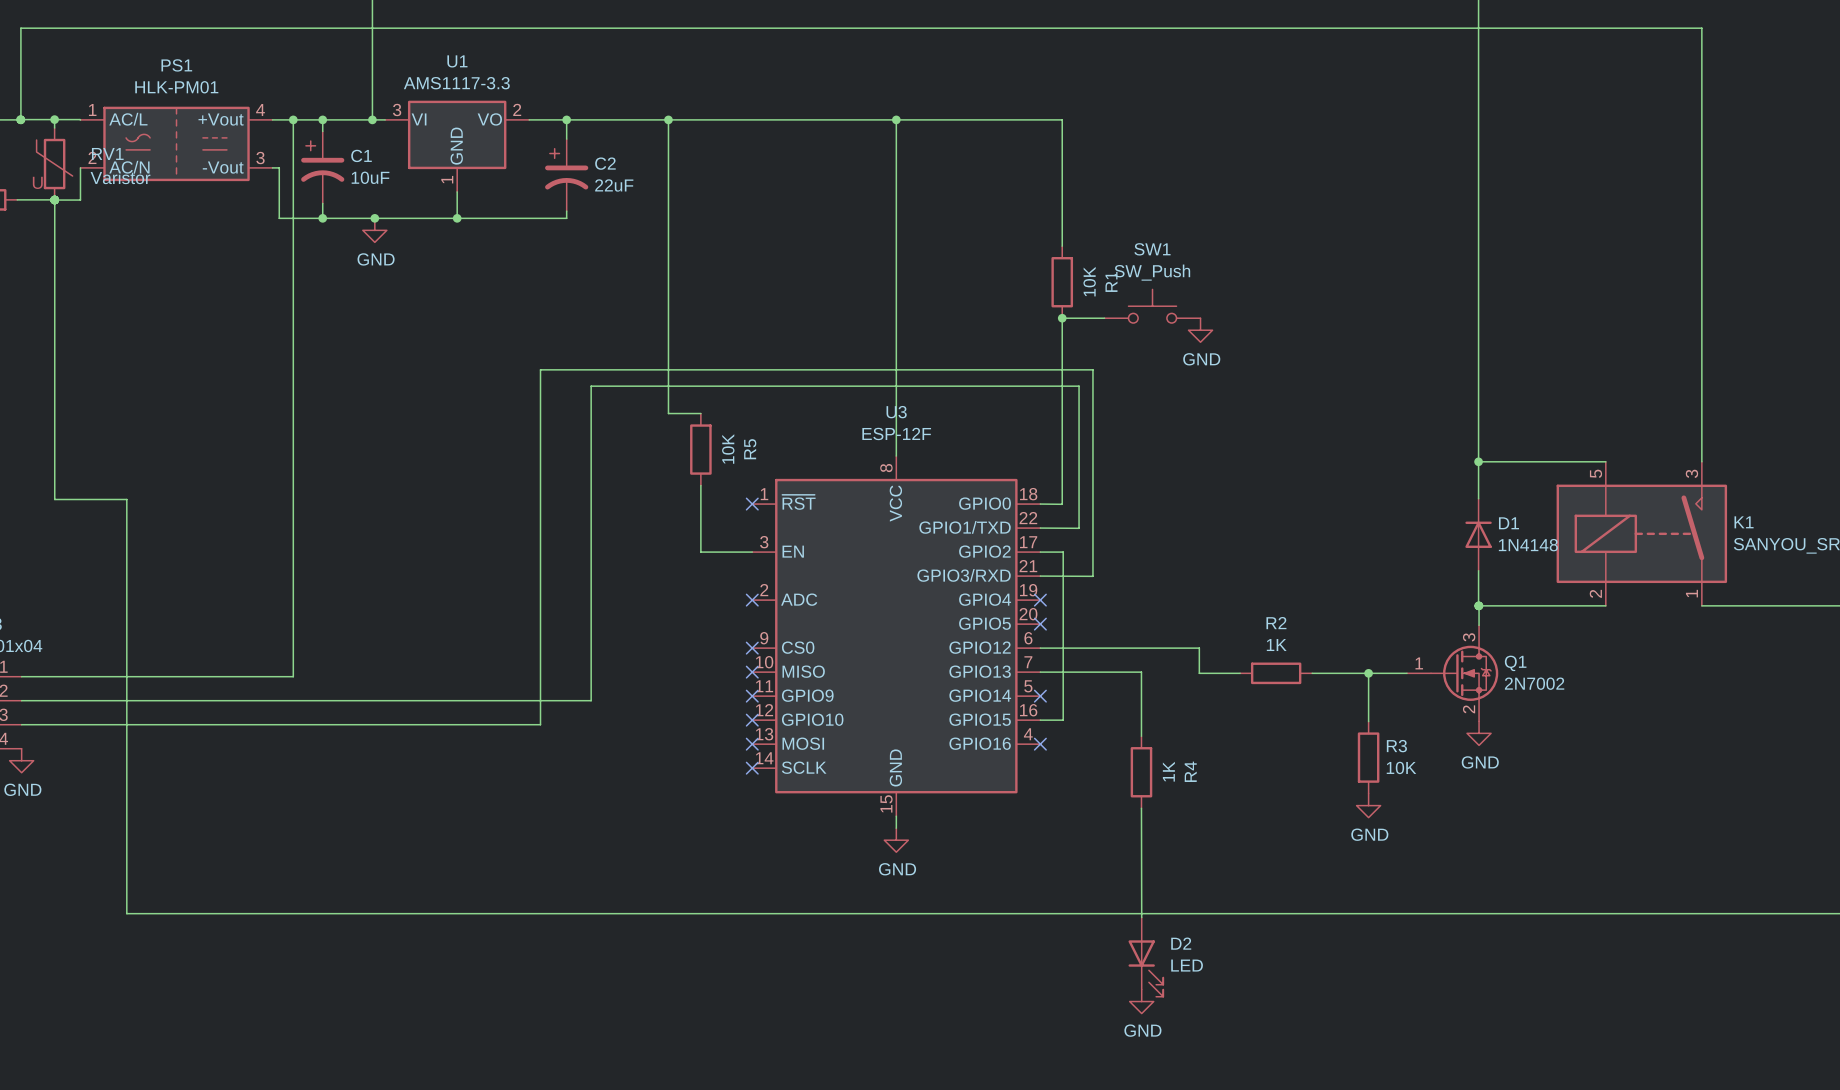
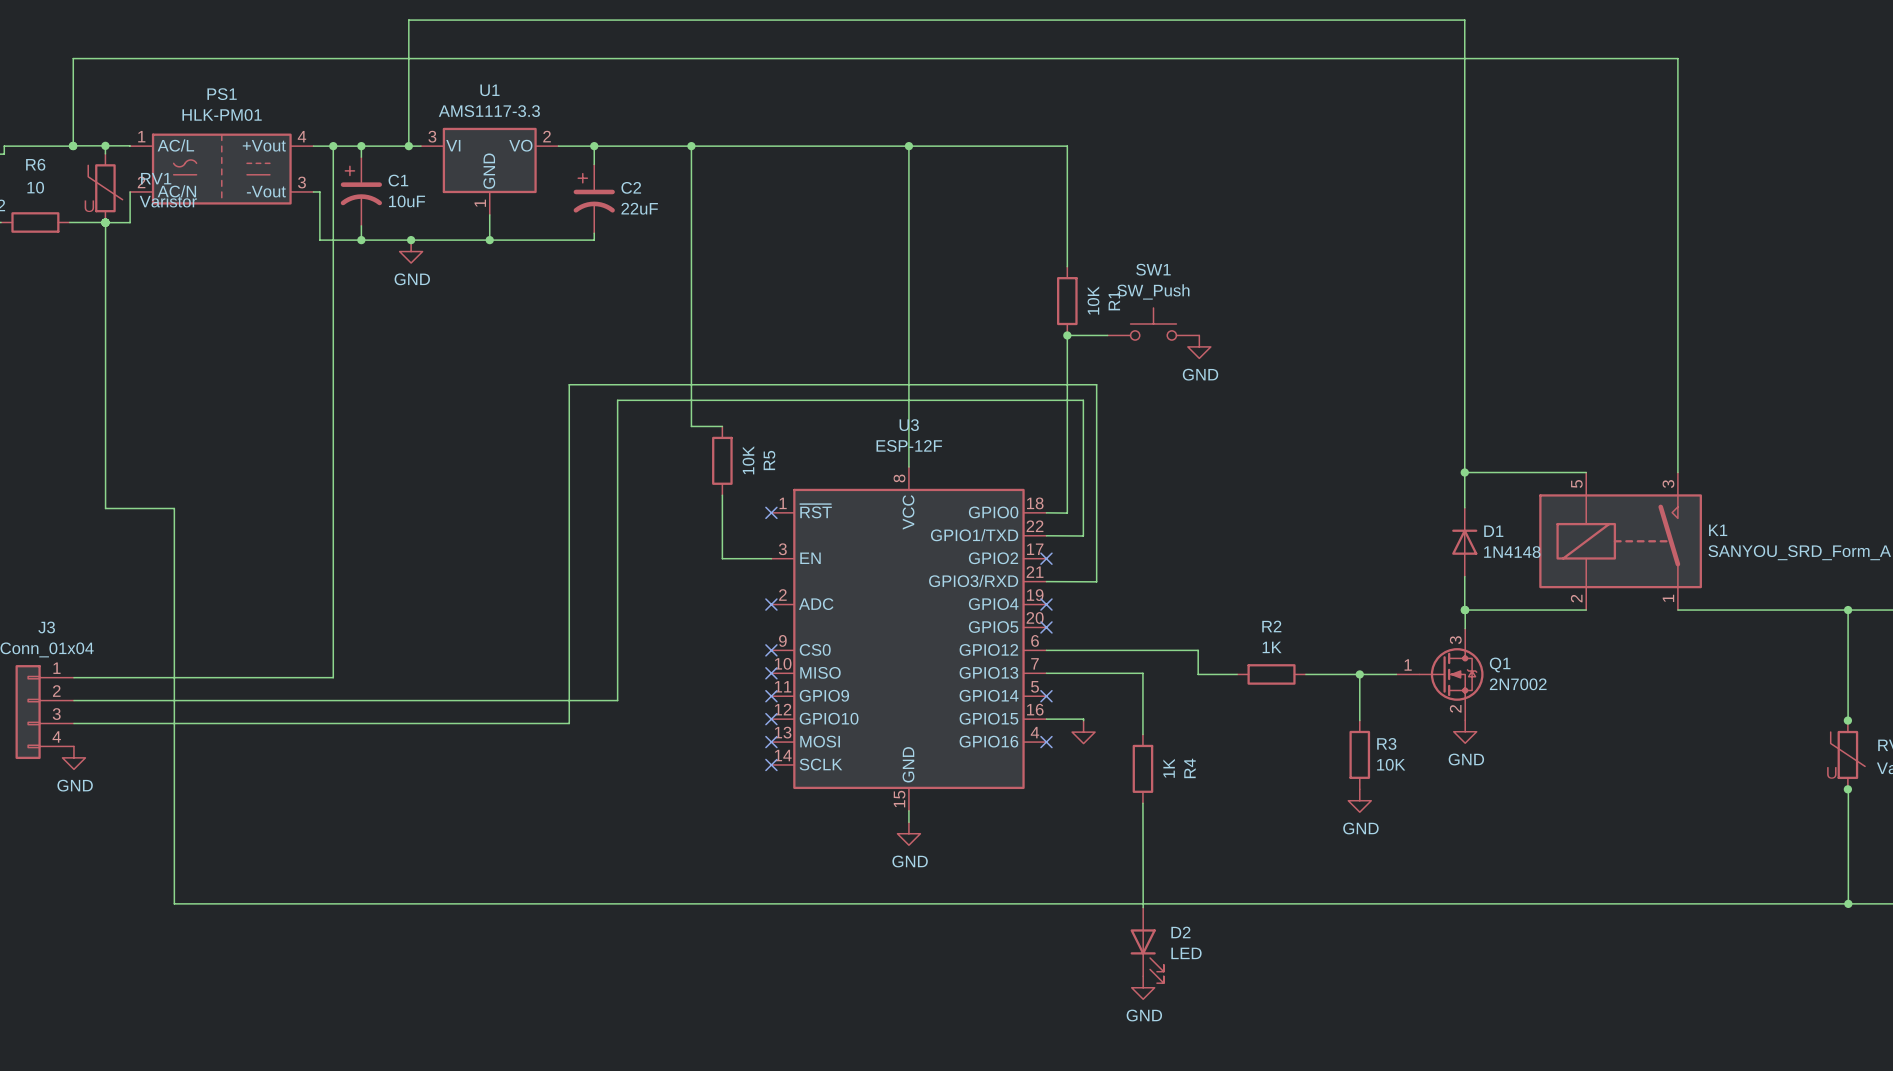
wire: (1040, 552) (1063, 552) (1063, 720) -> (1083, 720) (1083, 719) (1068, 719)
no-connect mark: none -> (1046, 558)
power symbol: none -> (1083, 732)

